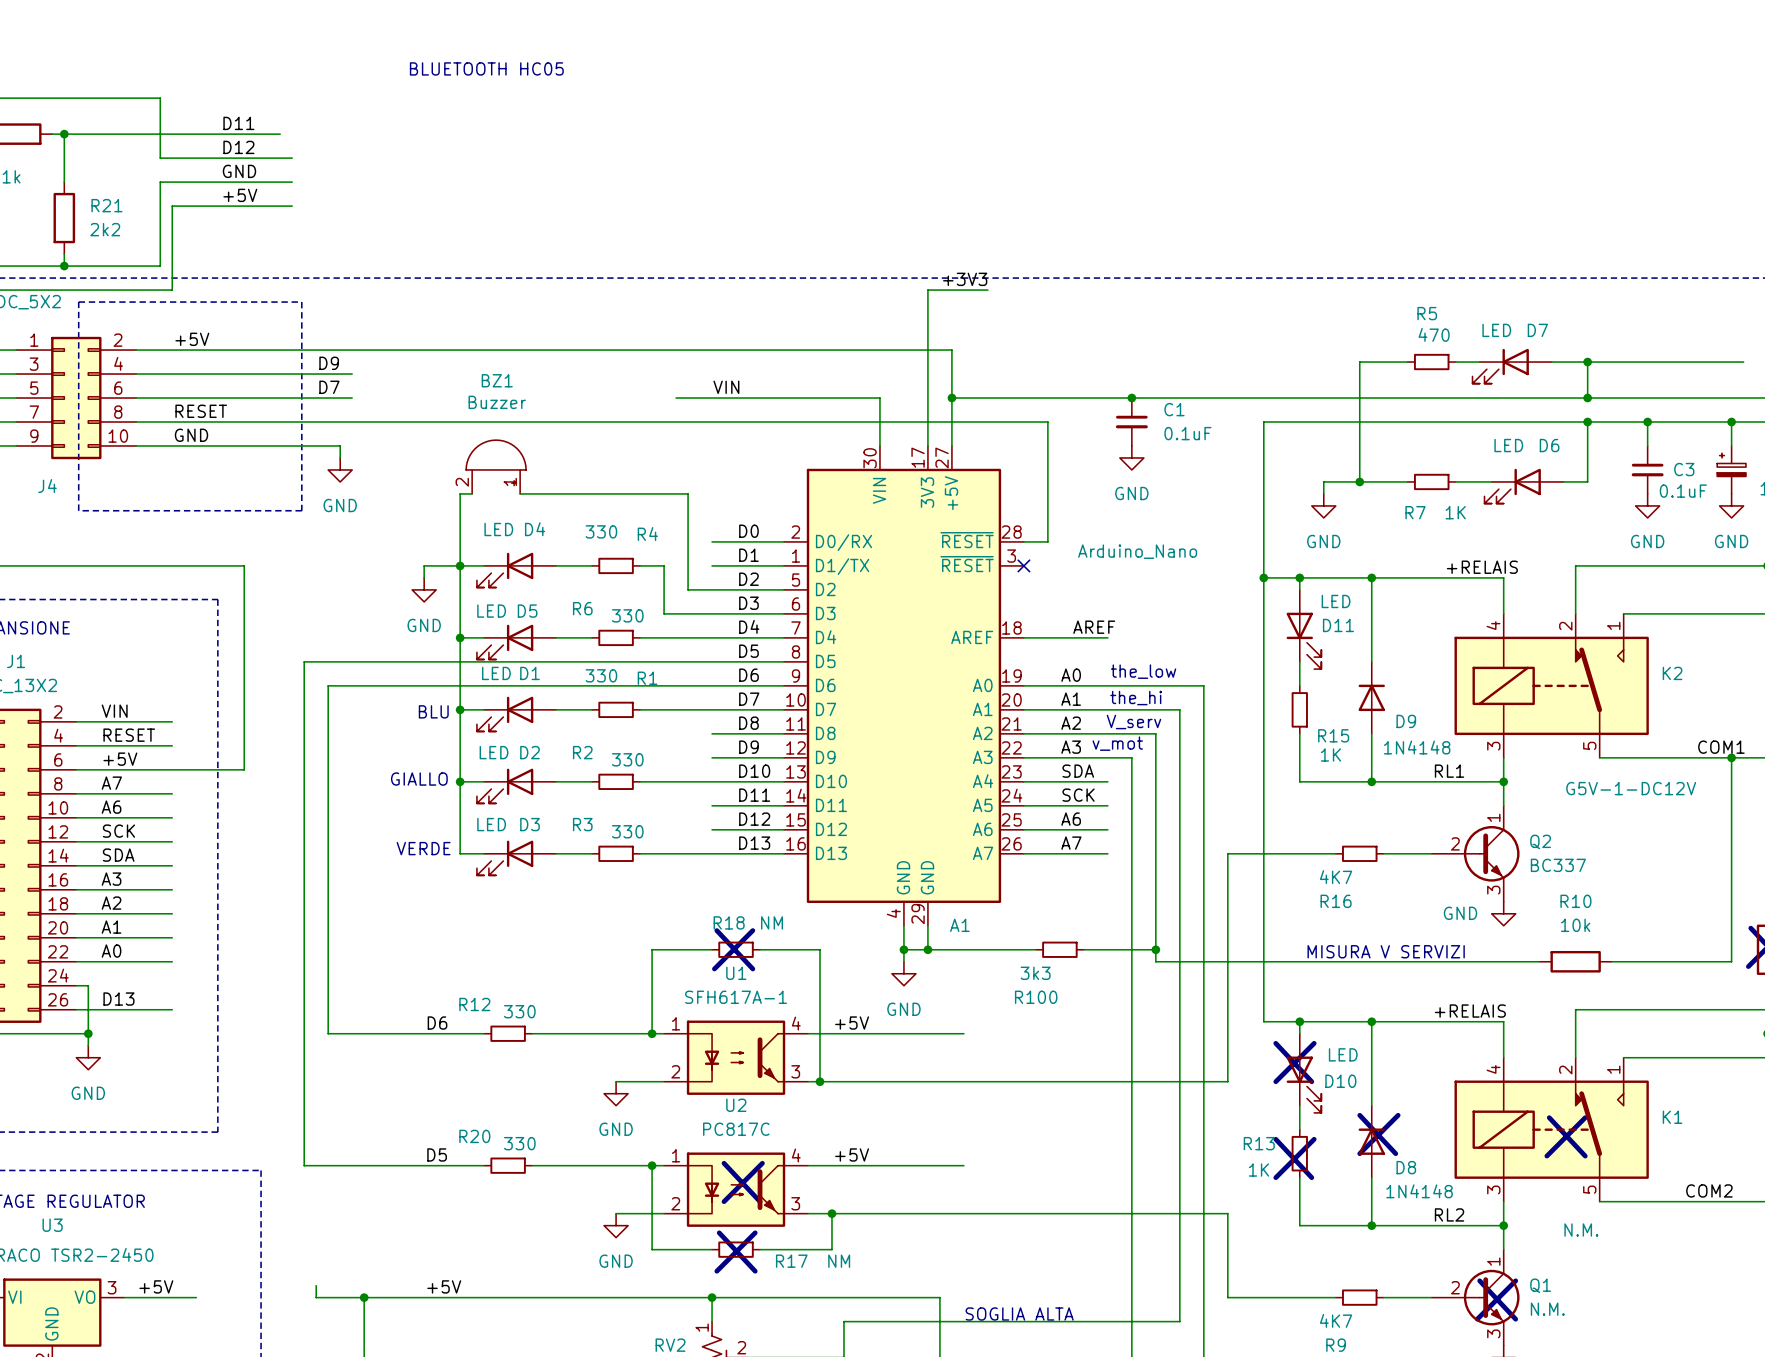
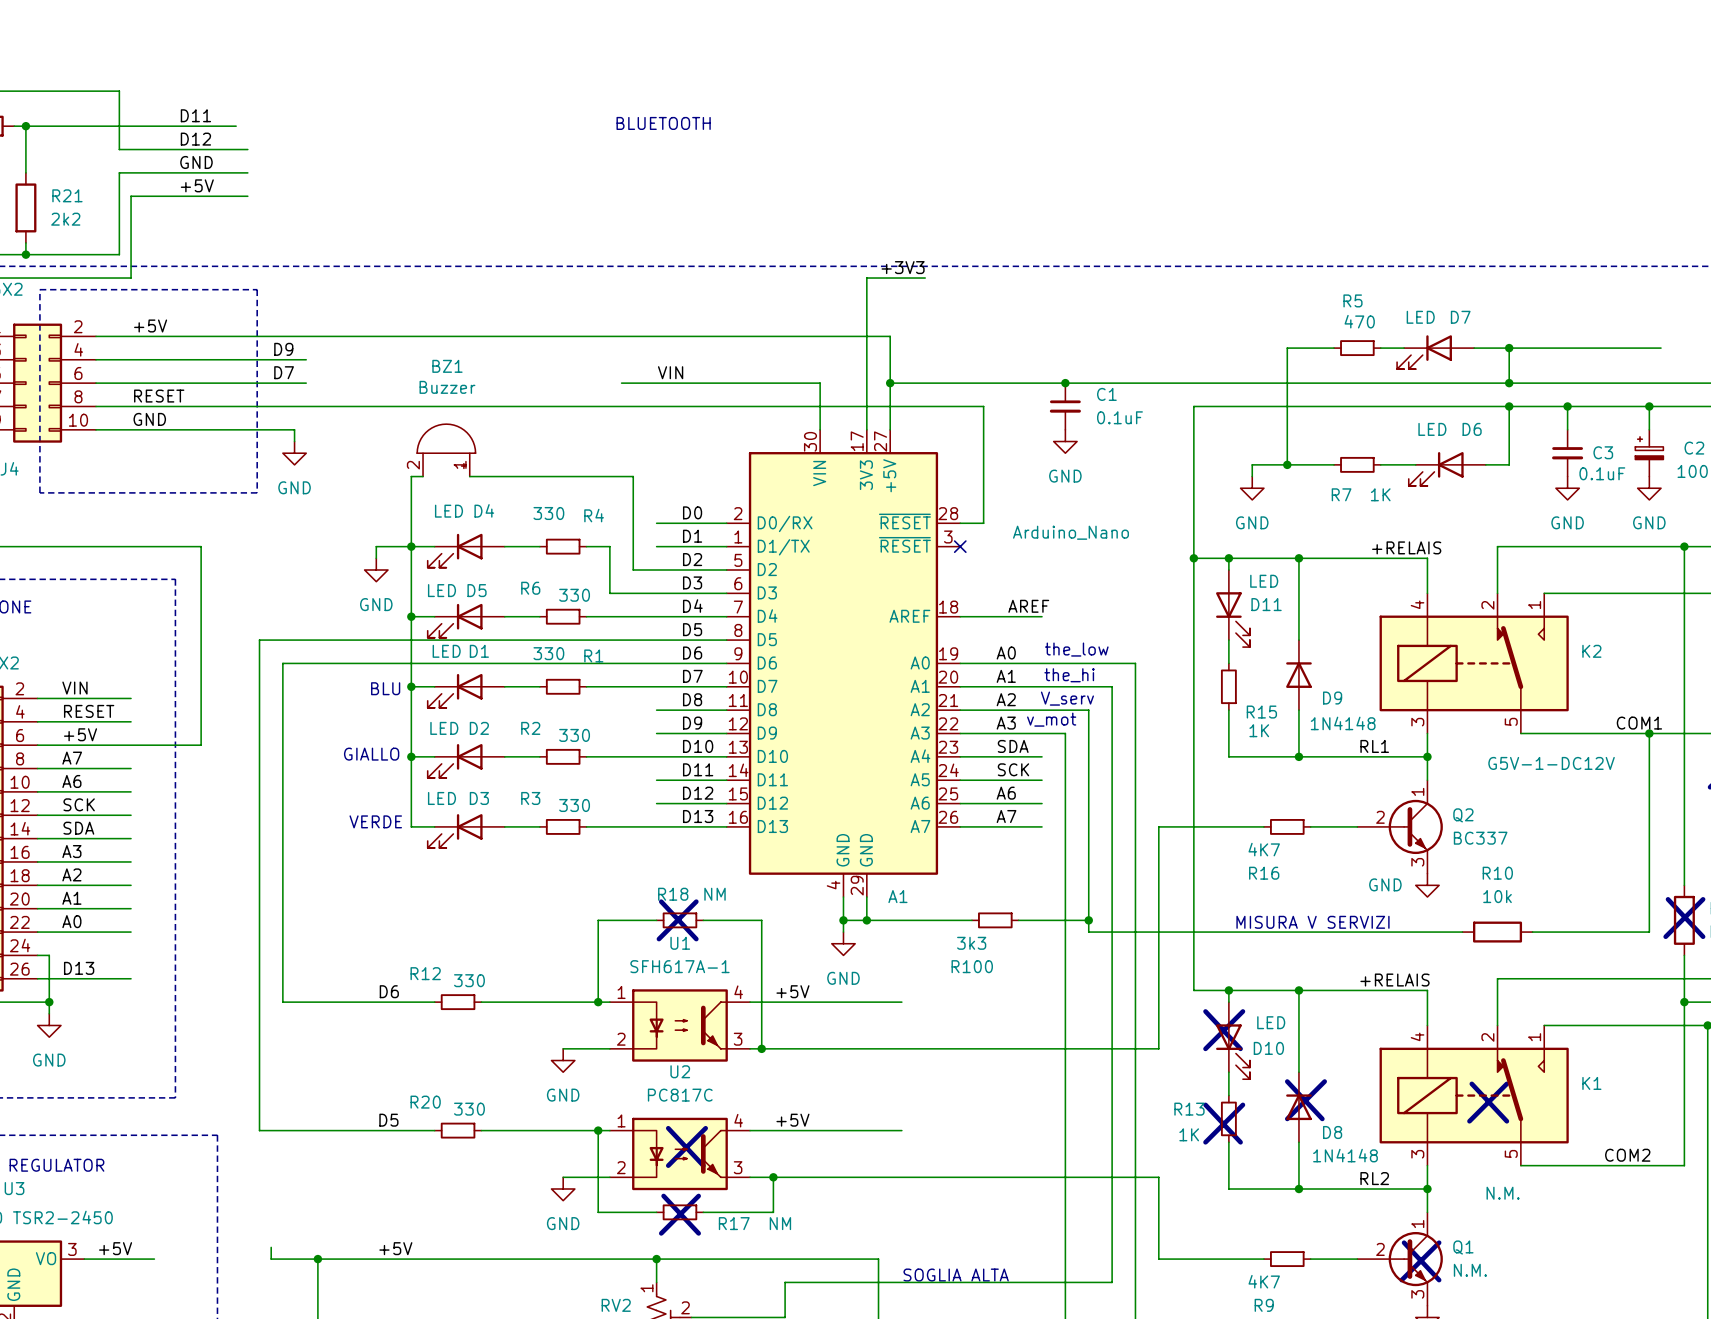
text: BLUETOOTH HC05 (486, 68) -> none
text: none -> BLUETOOTH (663, 123)

